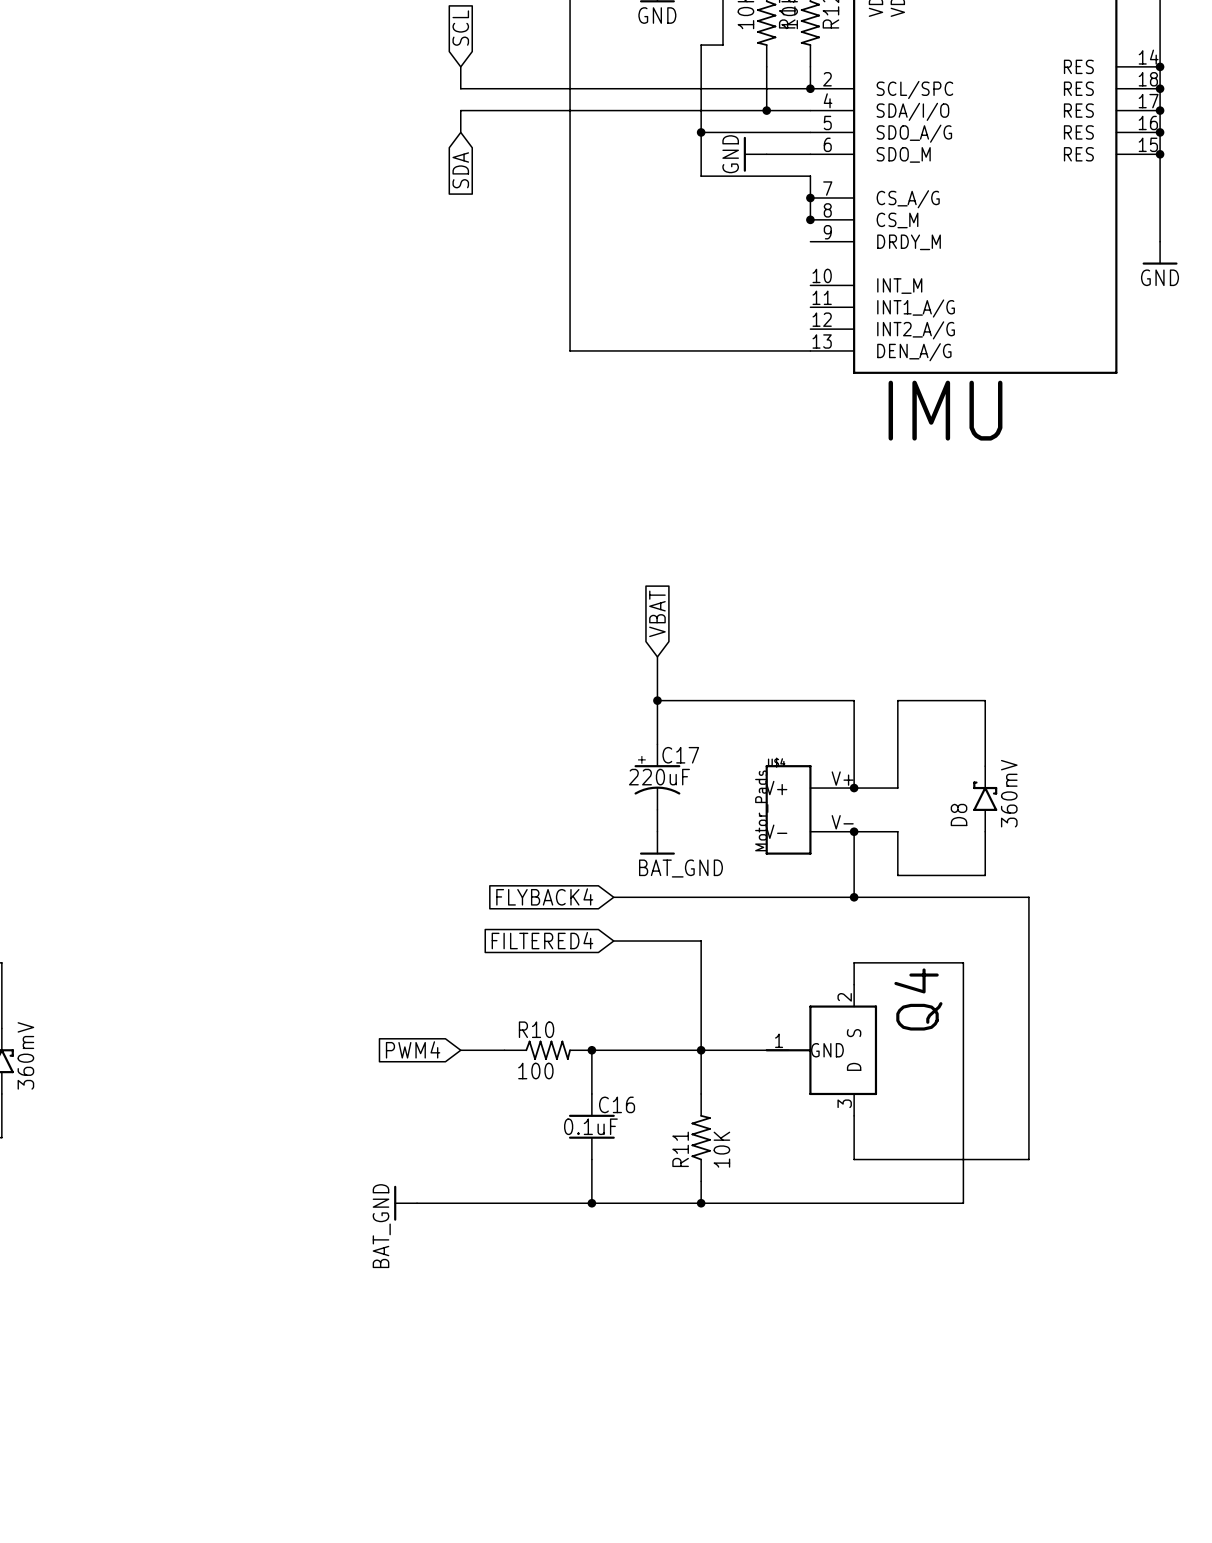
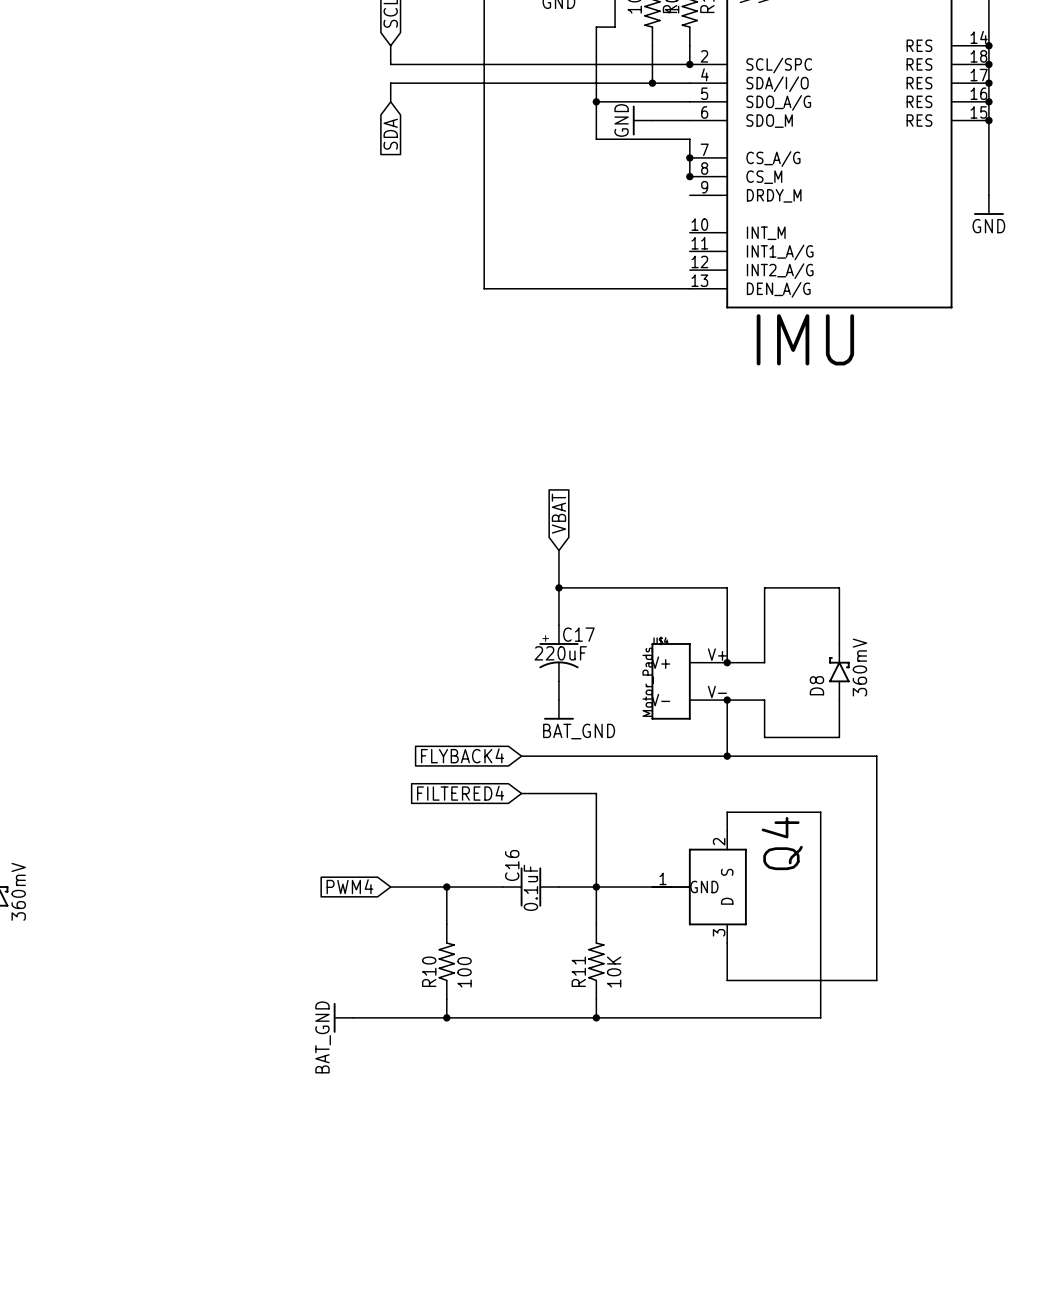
junction: none -> (446, 887)
R10 rotation: 0° (548, 1050) -> 90° counterclockwise (446, 961)
R10 position: (548, 1050) -> (446, 961)
junction: (591, 1050) -> none
wire: (657, 1050) (591, 1050) (591, 1093) -> none
C16 name position: C16 (617, 1104) -> C16 (512, 865)
C16 rotation: 0° (591, 1126) -> 90° clockwise (530, 887)
C16 position: (591, 1126) -> (530, 887)
wire: (591, 1159) (591, 1203) -> (446, 887) (446, 924)
wire: none -> (446, 999) (446, 1017)
junction: none -> (446, 1017)
junction: (591, 1203) -> none

